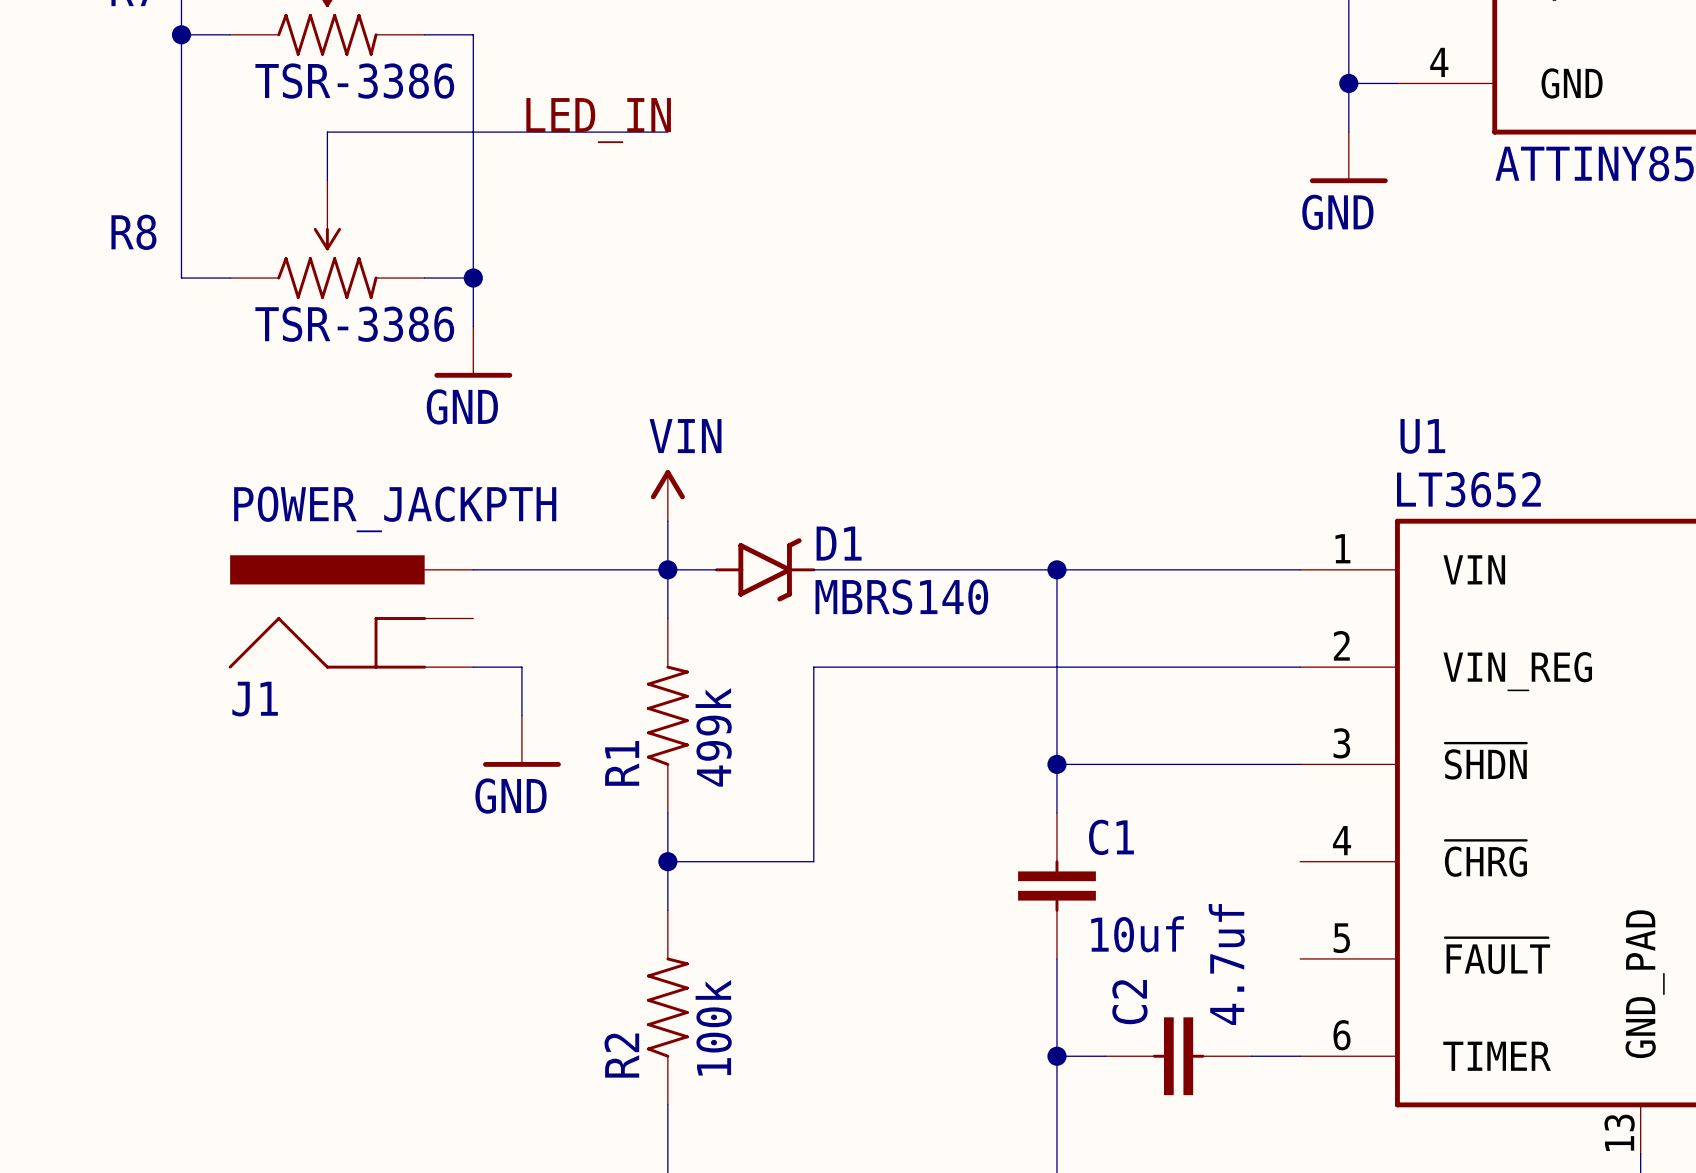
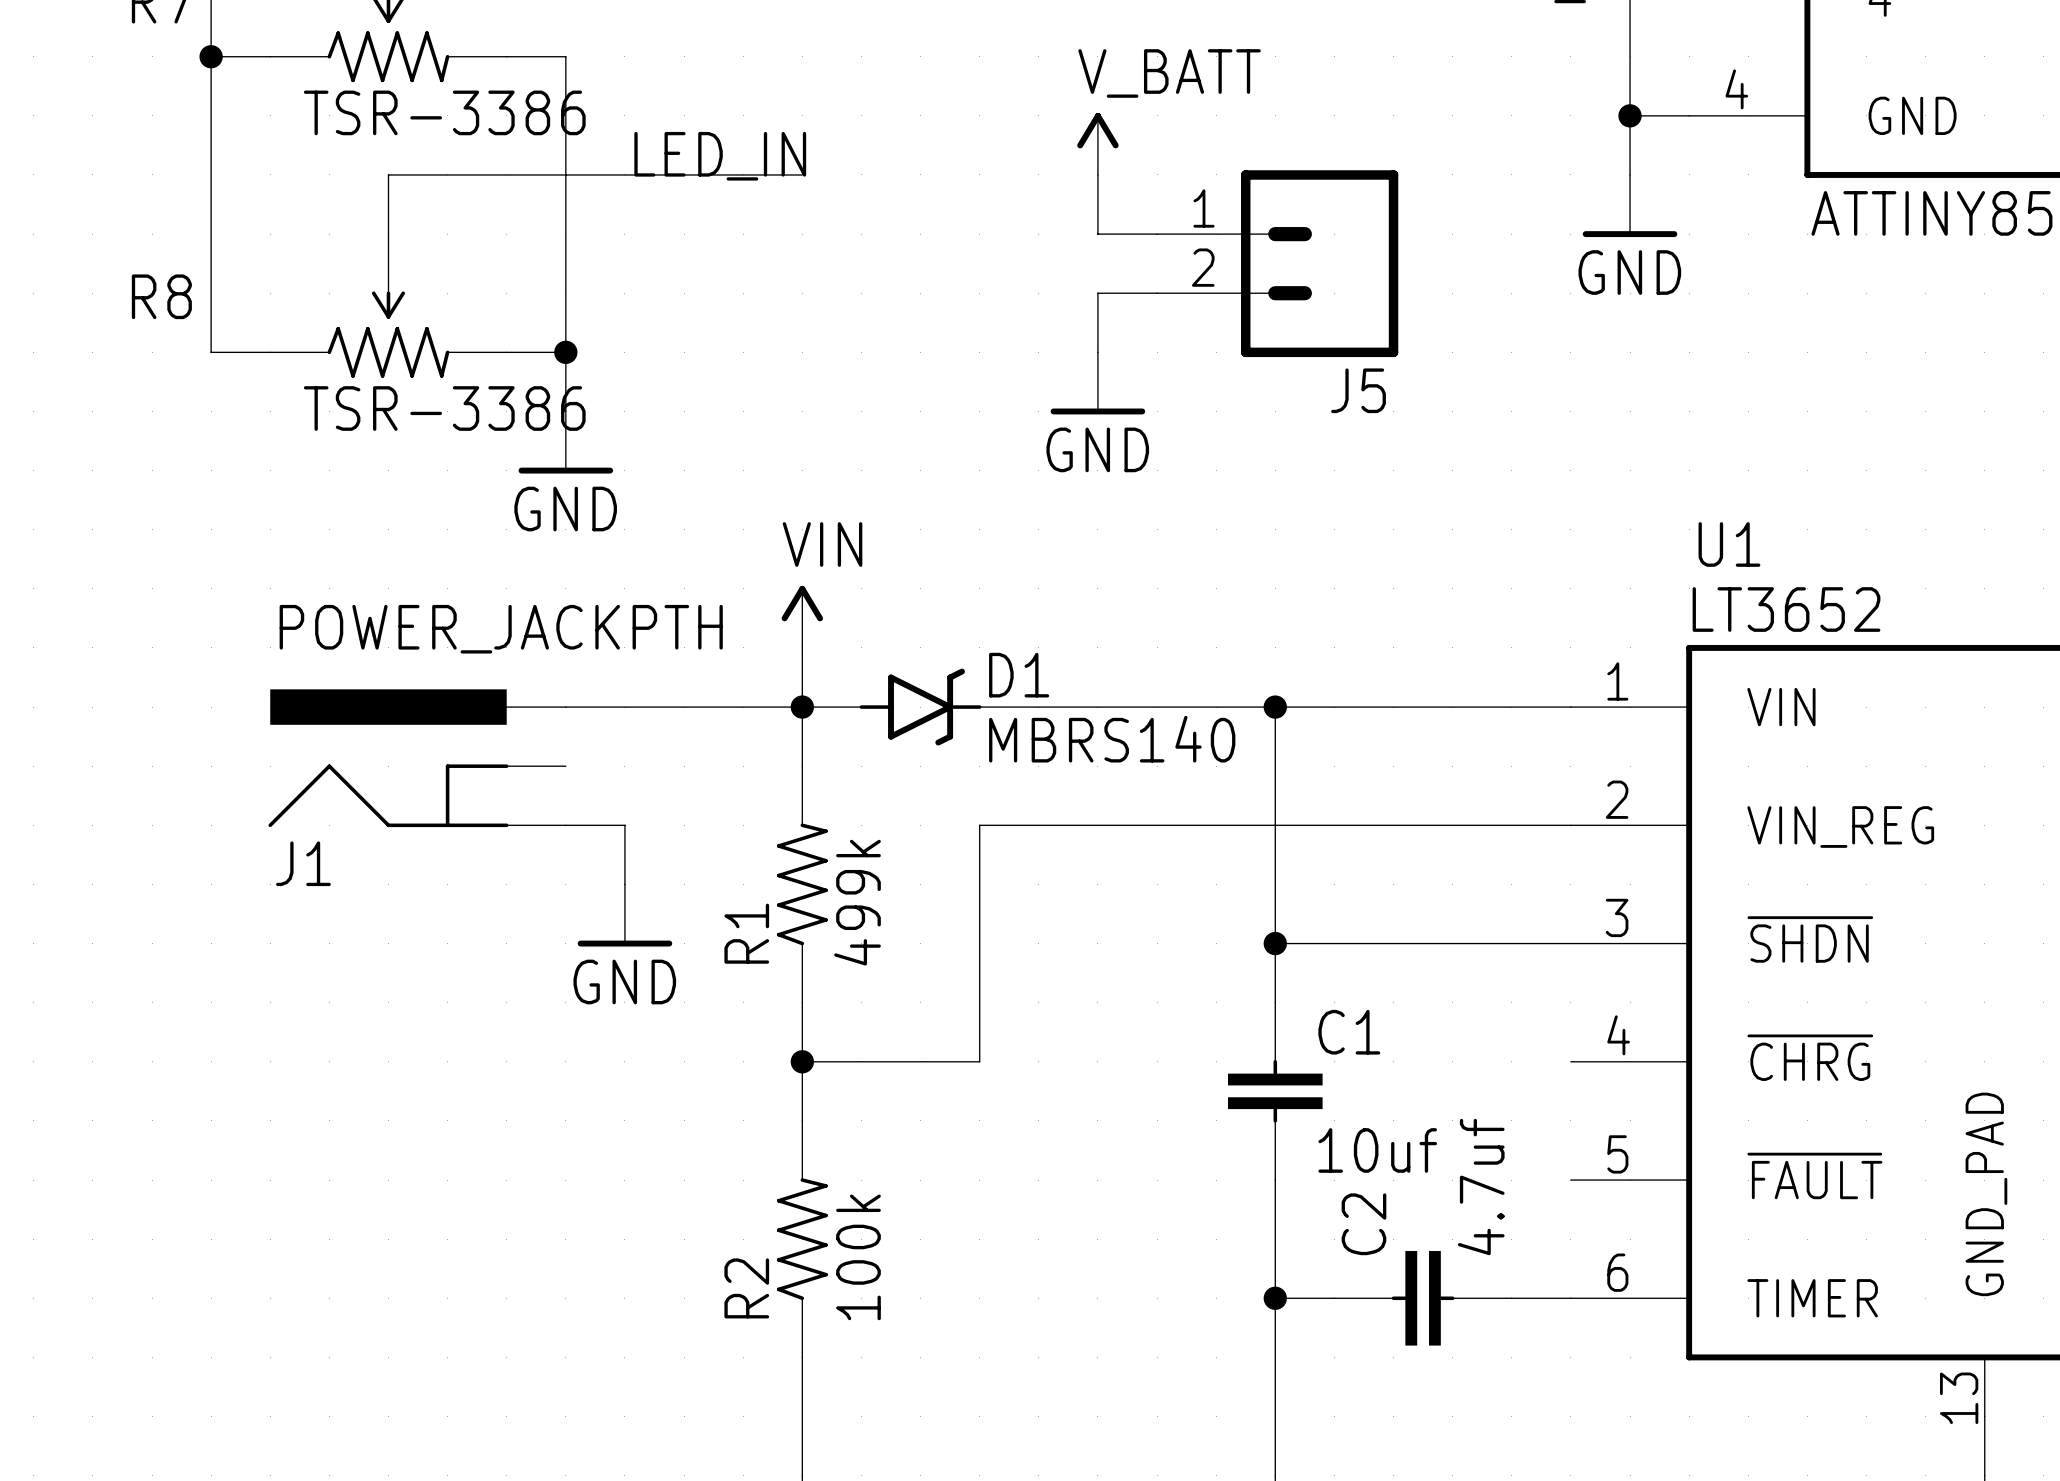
power symbol: none -> V_BATT (1097, 143)
wire: none -> (1097, 174) (1097, 234) (1157, 234)
J5: none -> (1277, 263)
wire: none -> (1157, 293) (1097, 293) (1097, 352)
power symbol: none -> GND (1097, 383)

